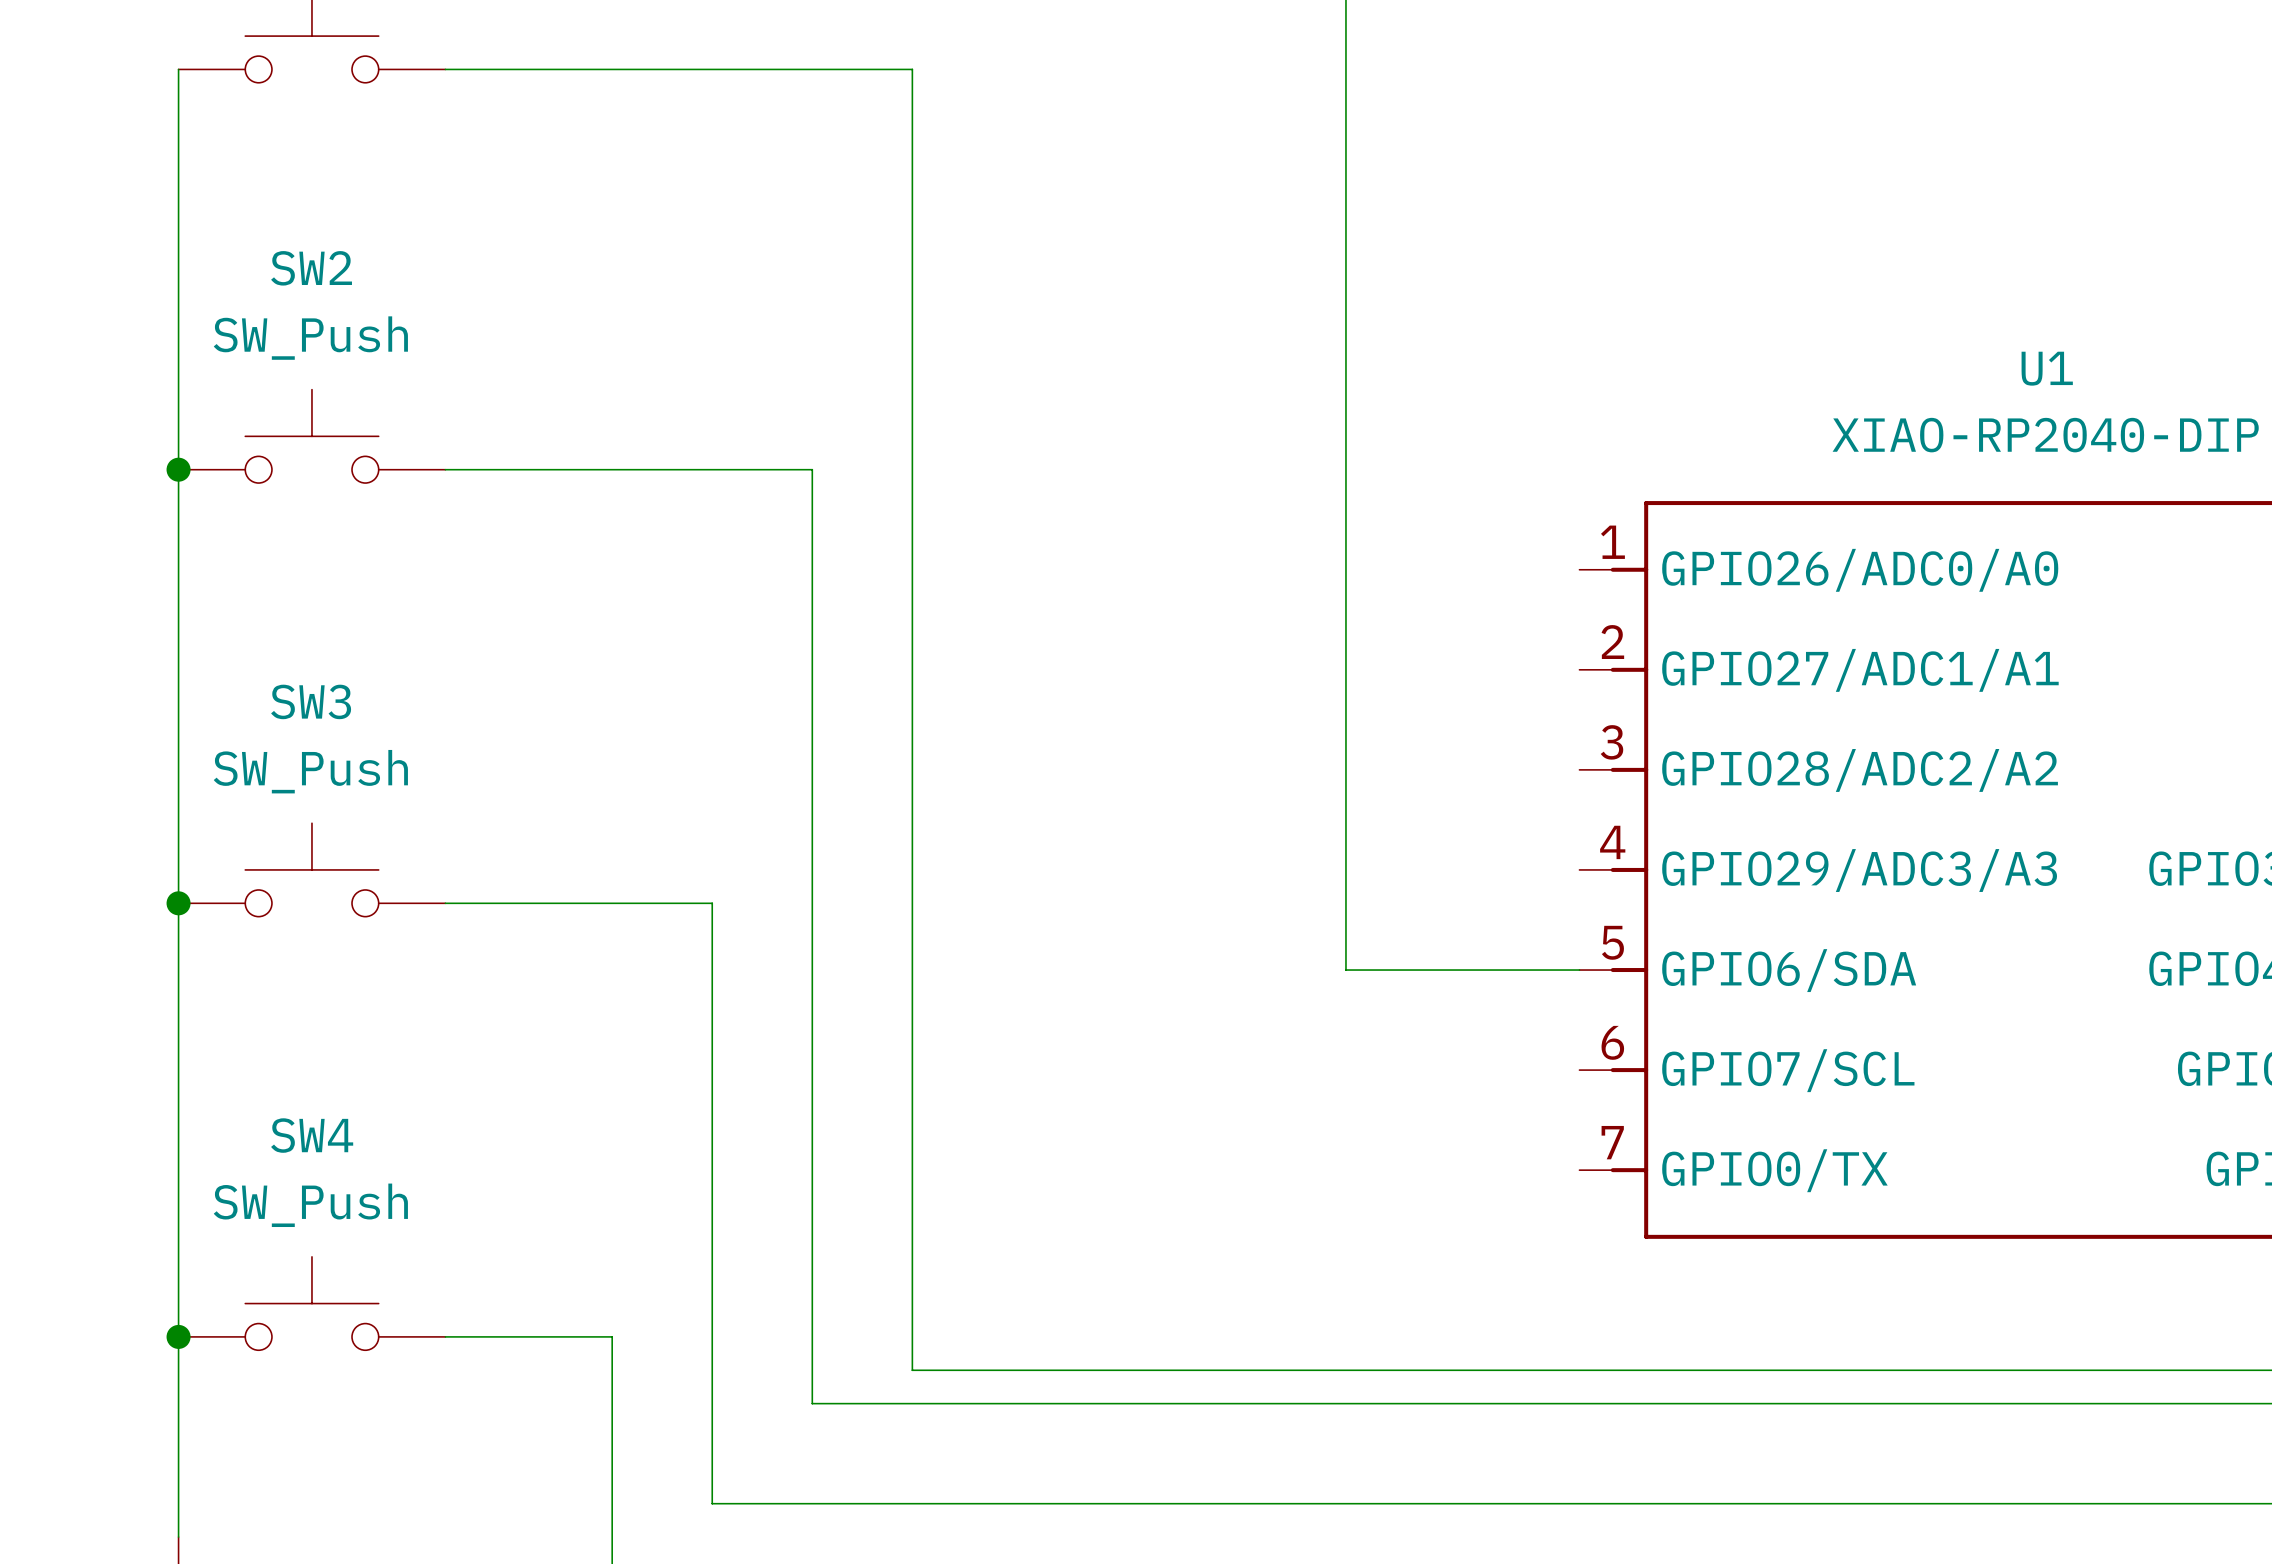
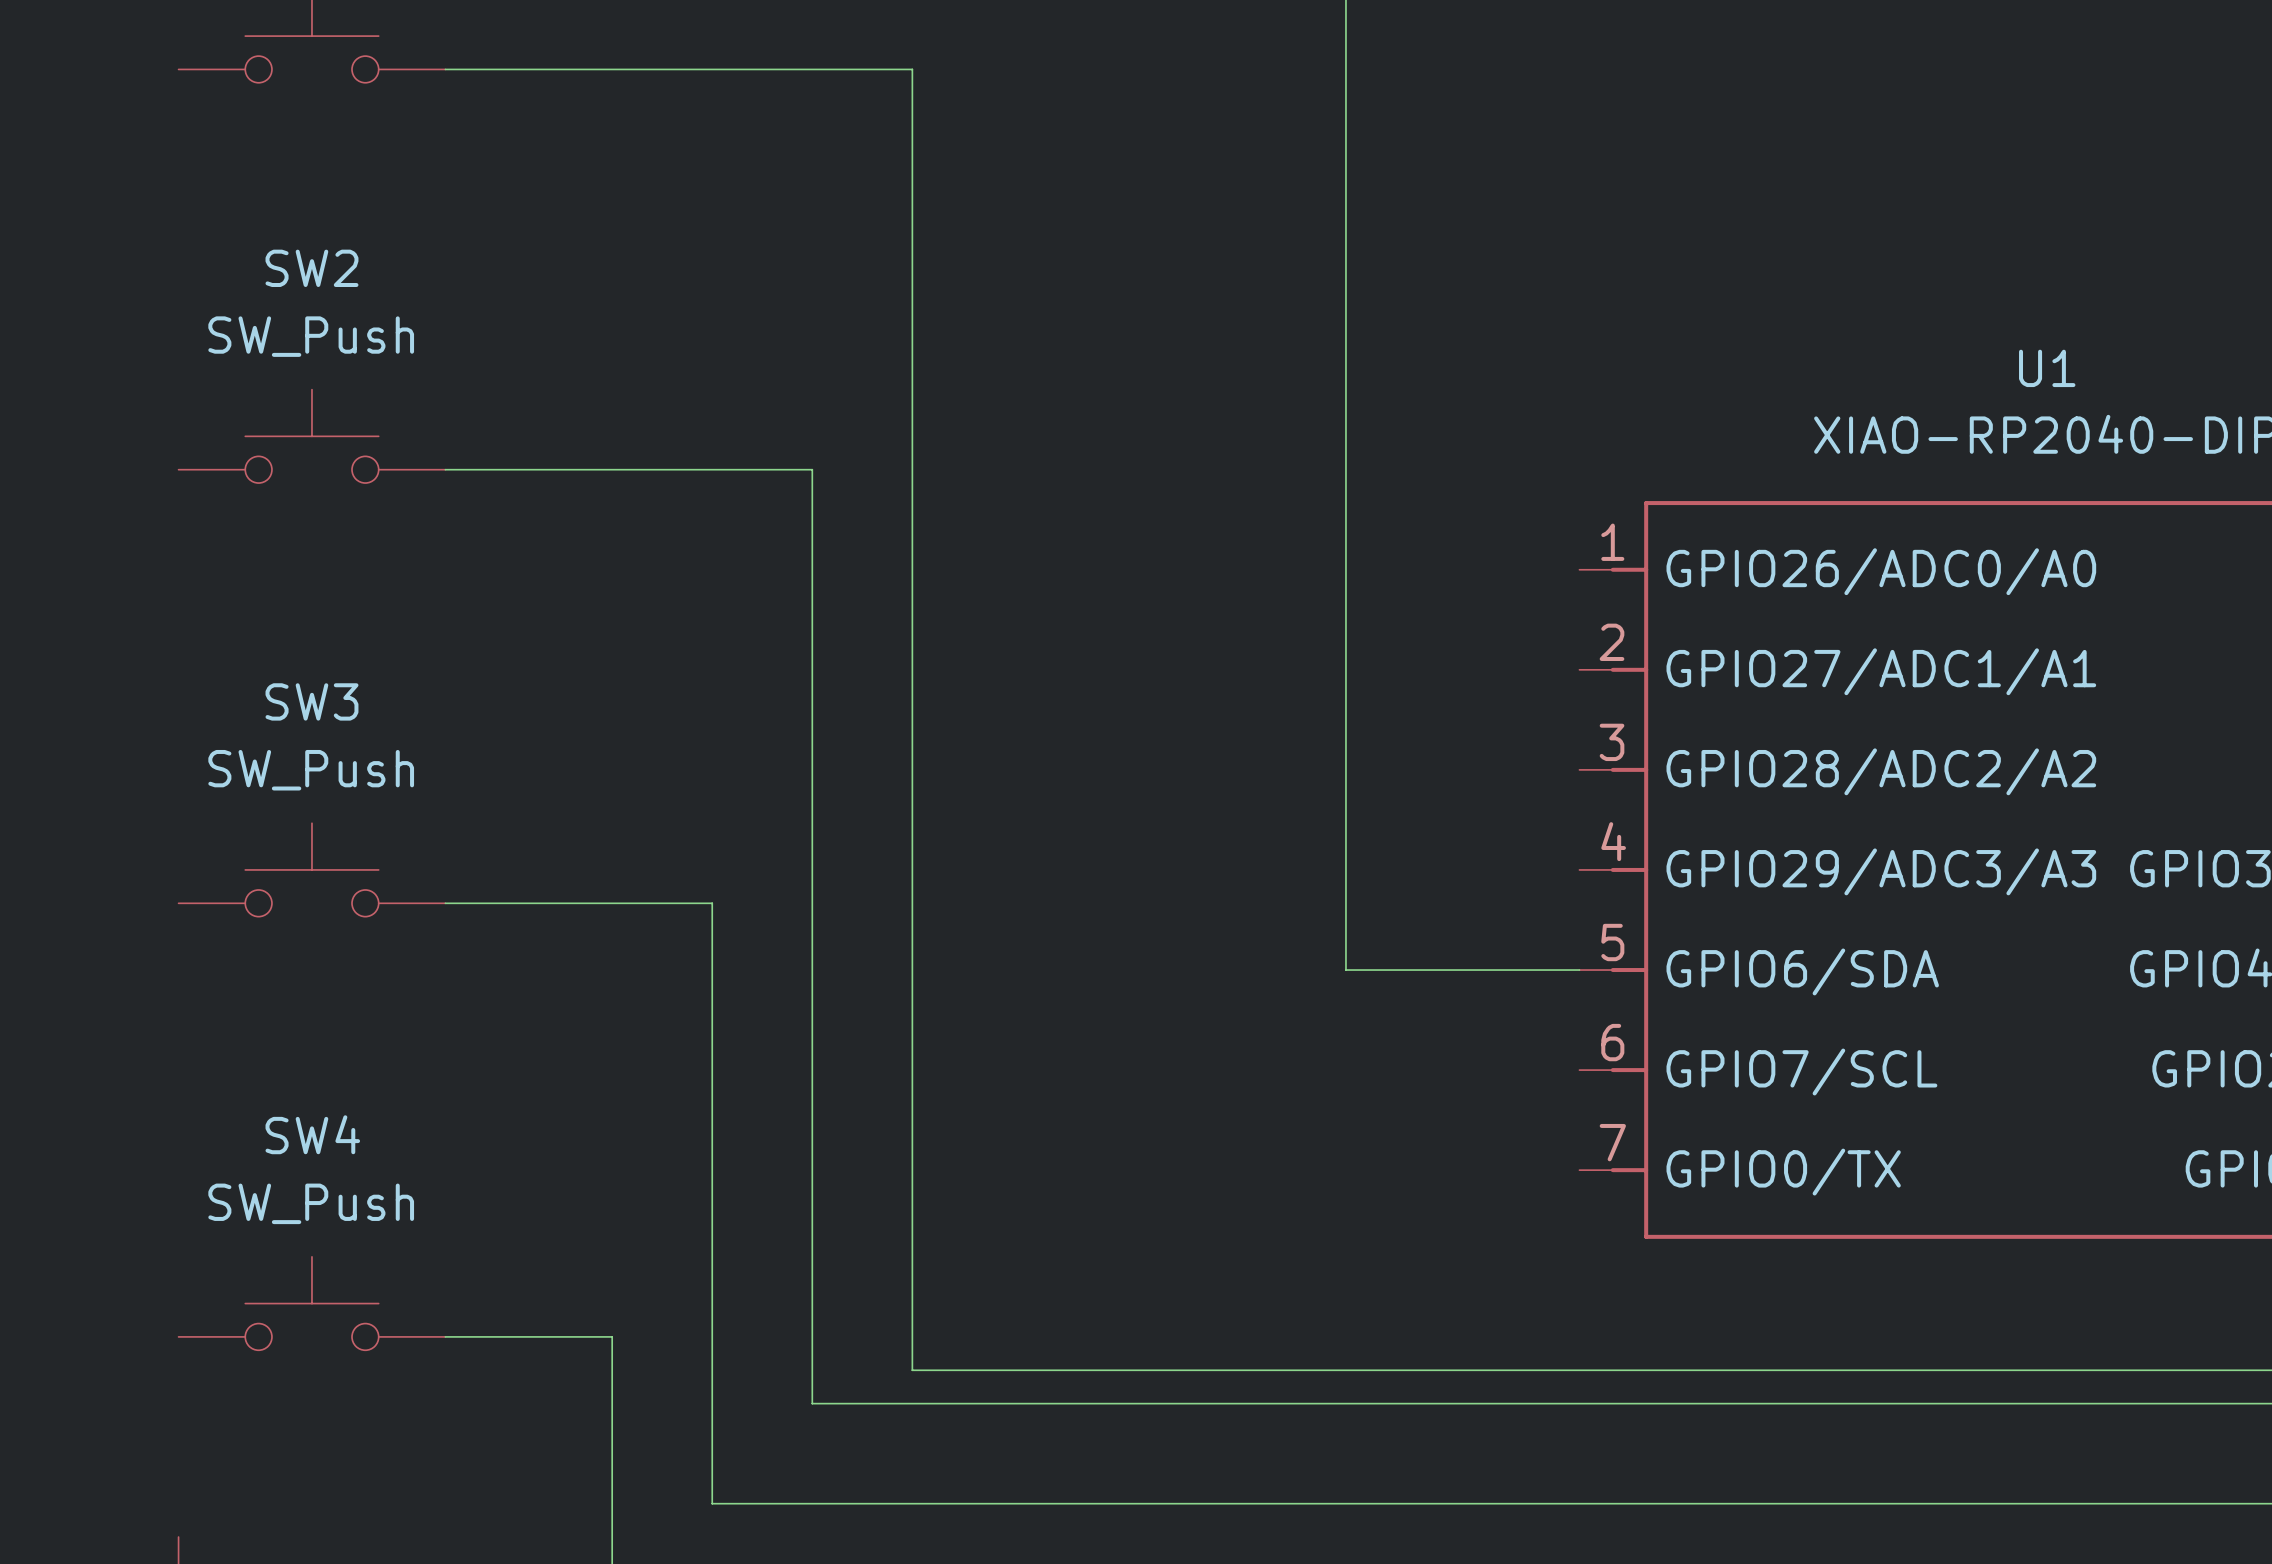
wire: (178, 69) (178, 1537) -> none
junction: (178, 469) -> none
junction: (178, 903) -> none
junction: (178, 1336) -> none

